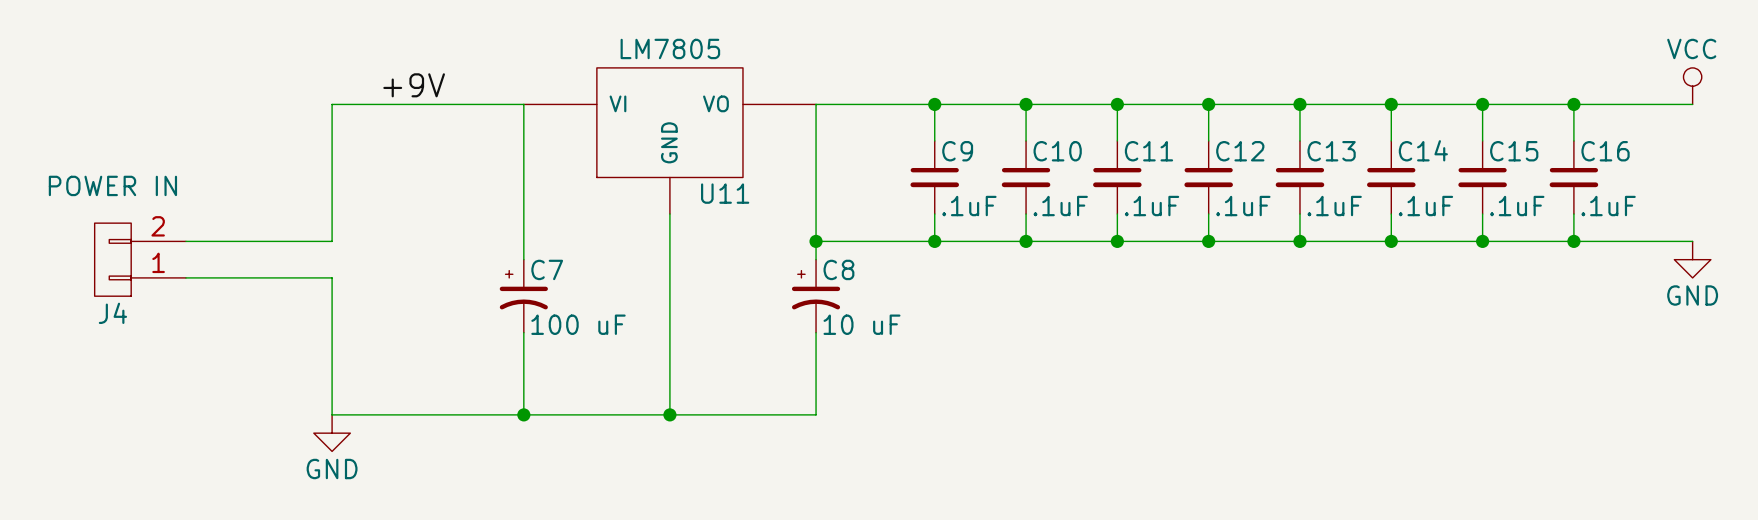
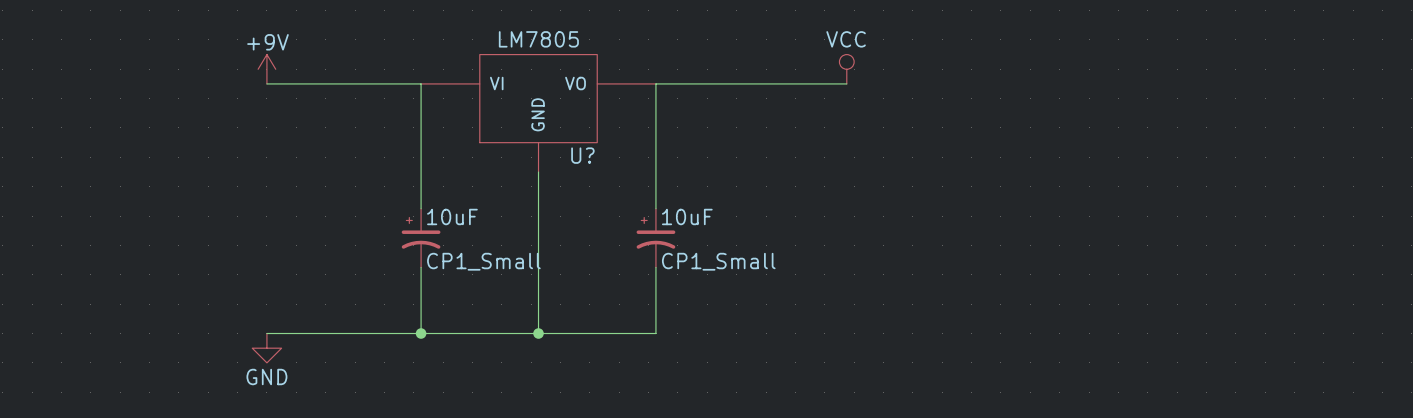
label: +9V (414, 85) -> none
power symbol: none -> +9V (266, 69)
power symbol: none -> VCC (846, 69)
power symbol: VCC (1692, 86) -> none
wire: (332, 104) (332, 241) (185, 241) -> none
wire: (934, 104) (934, 140) -> none
junction: (934, 104) -> none
wire: (1026, 104) (1026, 140) -> none
junction: (1026, 104) -> none
wire: (1053, 104) (1692, 104) -> none
wire: (1117, 104) (1117, 140) -> none
junction: (1117, 104) -> none
wire: (1208, 104) (1208, 140) -> none
junction: (1208, 104) -> none
wire: (1299, 104) (1299, 140) -> none
junction: (1299, 104) -> none
wire: (1391, 104) (1391, 140) -> none
junction: (1391, 104) -> none
wire: (1482, 104) (1482, 140) -> none
junction: (1482, 104) -> none
wire: (1573, 104) (1573, 140) -> none
junction: (1573, 104) -> none
C9: .1uF (934, 177) -> none
C10: .1uF (1026, 177) -> none
C11: .1uF (1117, 177) -> none
C12: .1uF (1208, 177) -> none
C13: .1uF (1299, 177) -> none
C14: .1uF (1391, 177) -> none
C15: .1uF (1482, 177) -> none
C16: .1uF (1573, 177) -> none
U11 name: U11 (725, 193) -> U? (582, 155)
wire: (934, 214) (934, 241) -> none
wire: (1026, 214) (1026, 241) -> none
wire: (1117, 214) (1117, 241) -> none
wire: (1208, 214) (1208, 241) -> none
wire: (1299, 214) (1299, 241) -> none
wire: (1391, 214) (1391, 241) -> none
wire: (1482, 214) (1482, 241) -> none
wire: (1573, 214) (1573, 241) -> none
wire: (816, 241) (1692, 241) -> none
junction: (816, 241) -> none
junction: (934, 241) -> none
junction: (1026, 241) -> none
junction: (1117, 241) -> none
junction: (1208, 241) -> none
junction: (1299, 241) -> none
junction: (1391, 241) -> none
junction: (1482, 241) -> none
junction: (1573, 241) -> none
J4: POWER IN (140, 259) -> none
power symbol: GND (1692, 259) -> none
C7 name: C7 (547, 269) -> 10uF (452, 216)
C8 name: C8 (838, 269) -> 10uF (687, 216)
wire: (185, 277) (332, 277) (332, 414) -> none
C7 value: 100 uF (578, 324) -> CP1_Small (483, 261)
C8 value: 10 uF (861, 324) -> CP1_Small (718, 261)

